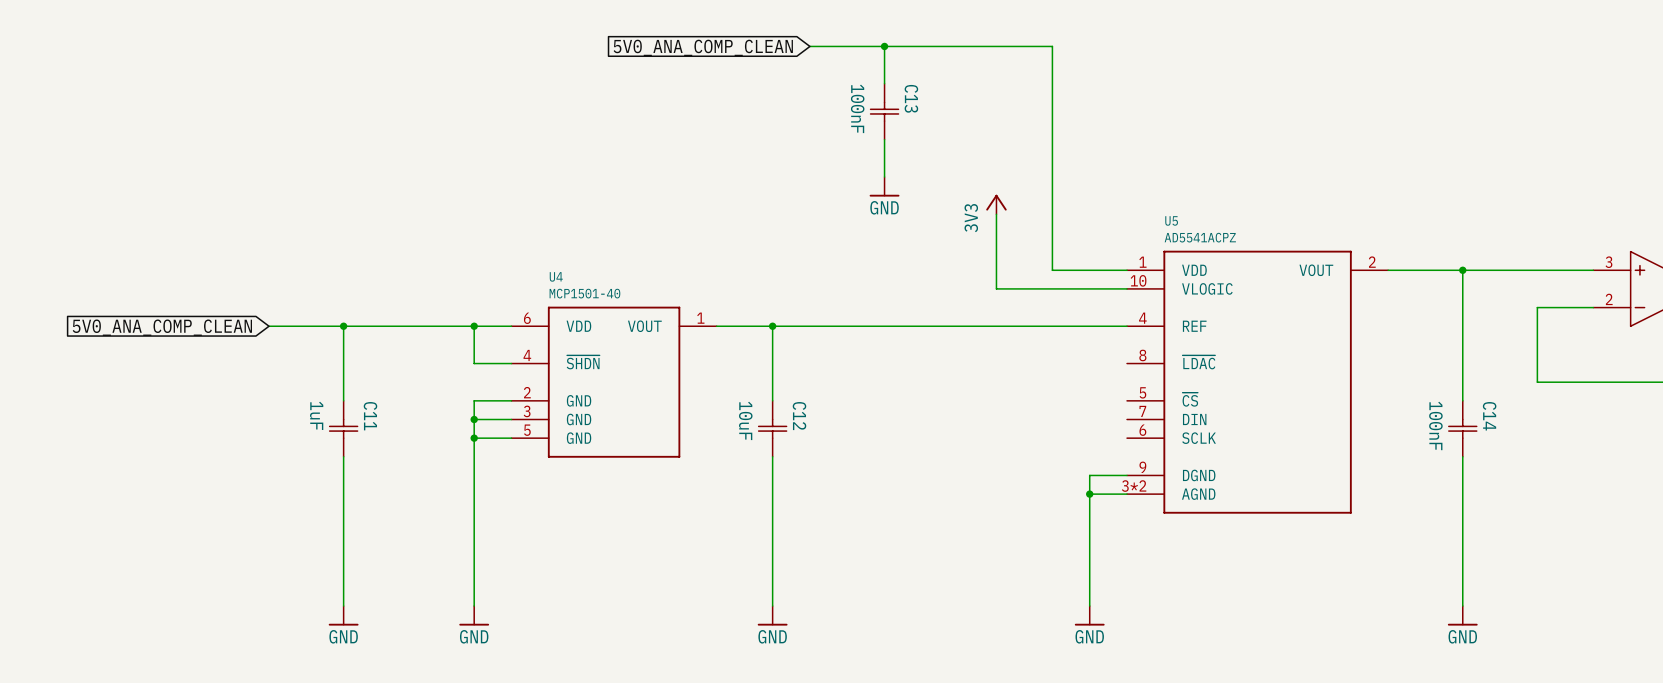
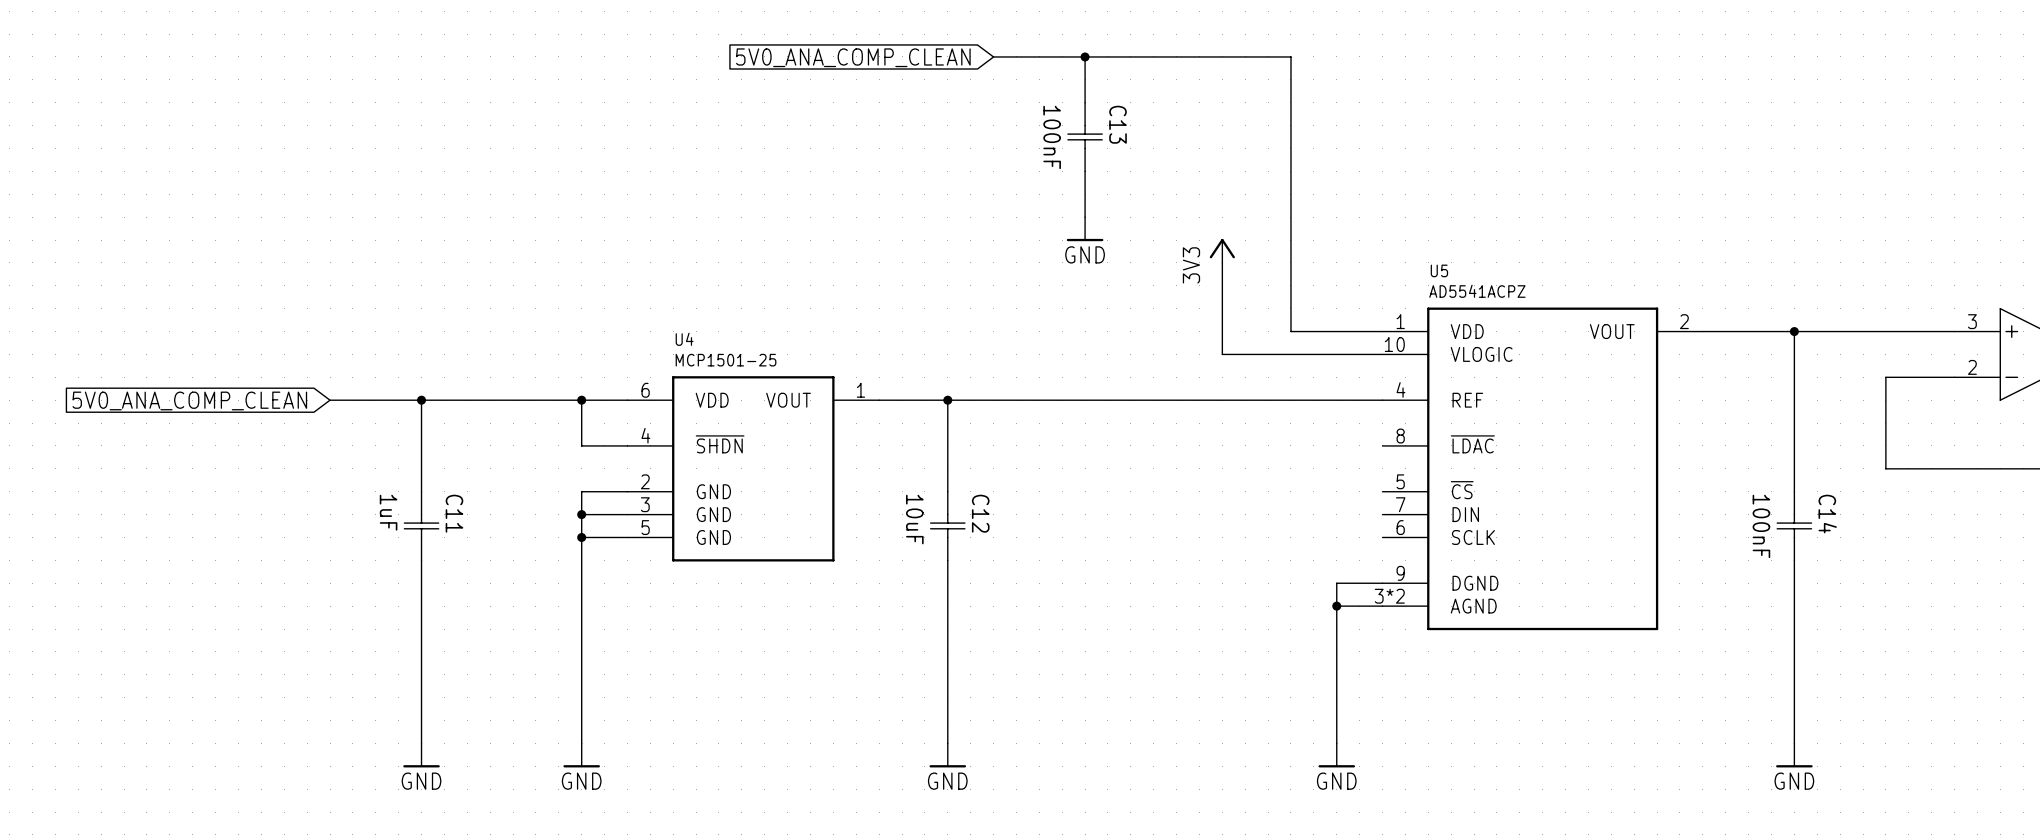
U4 value: MCP1501-40 (584, 293) -> MCP1501-25 (726, 360)

